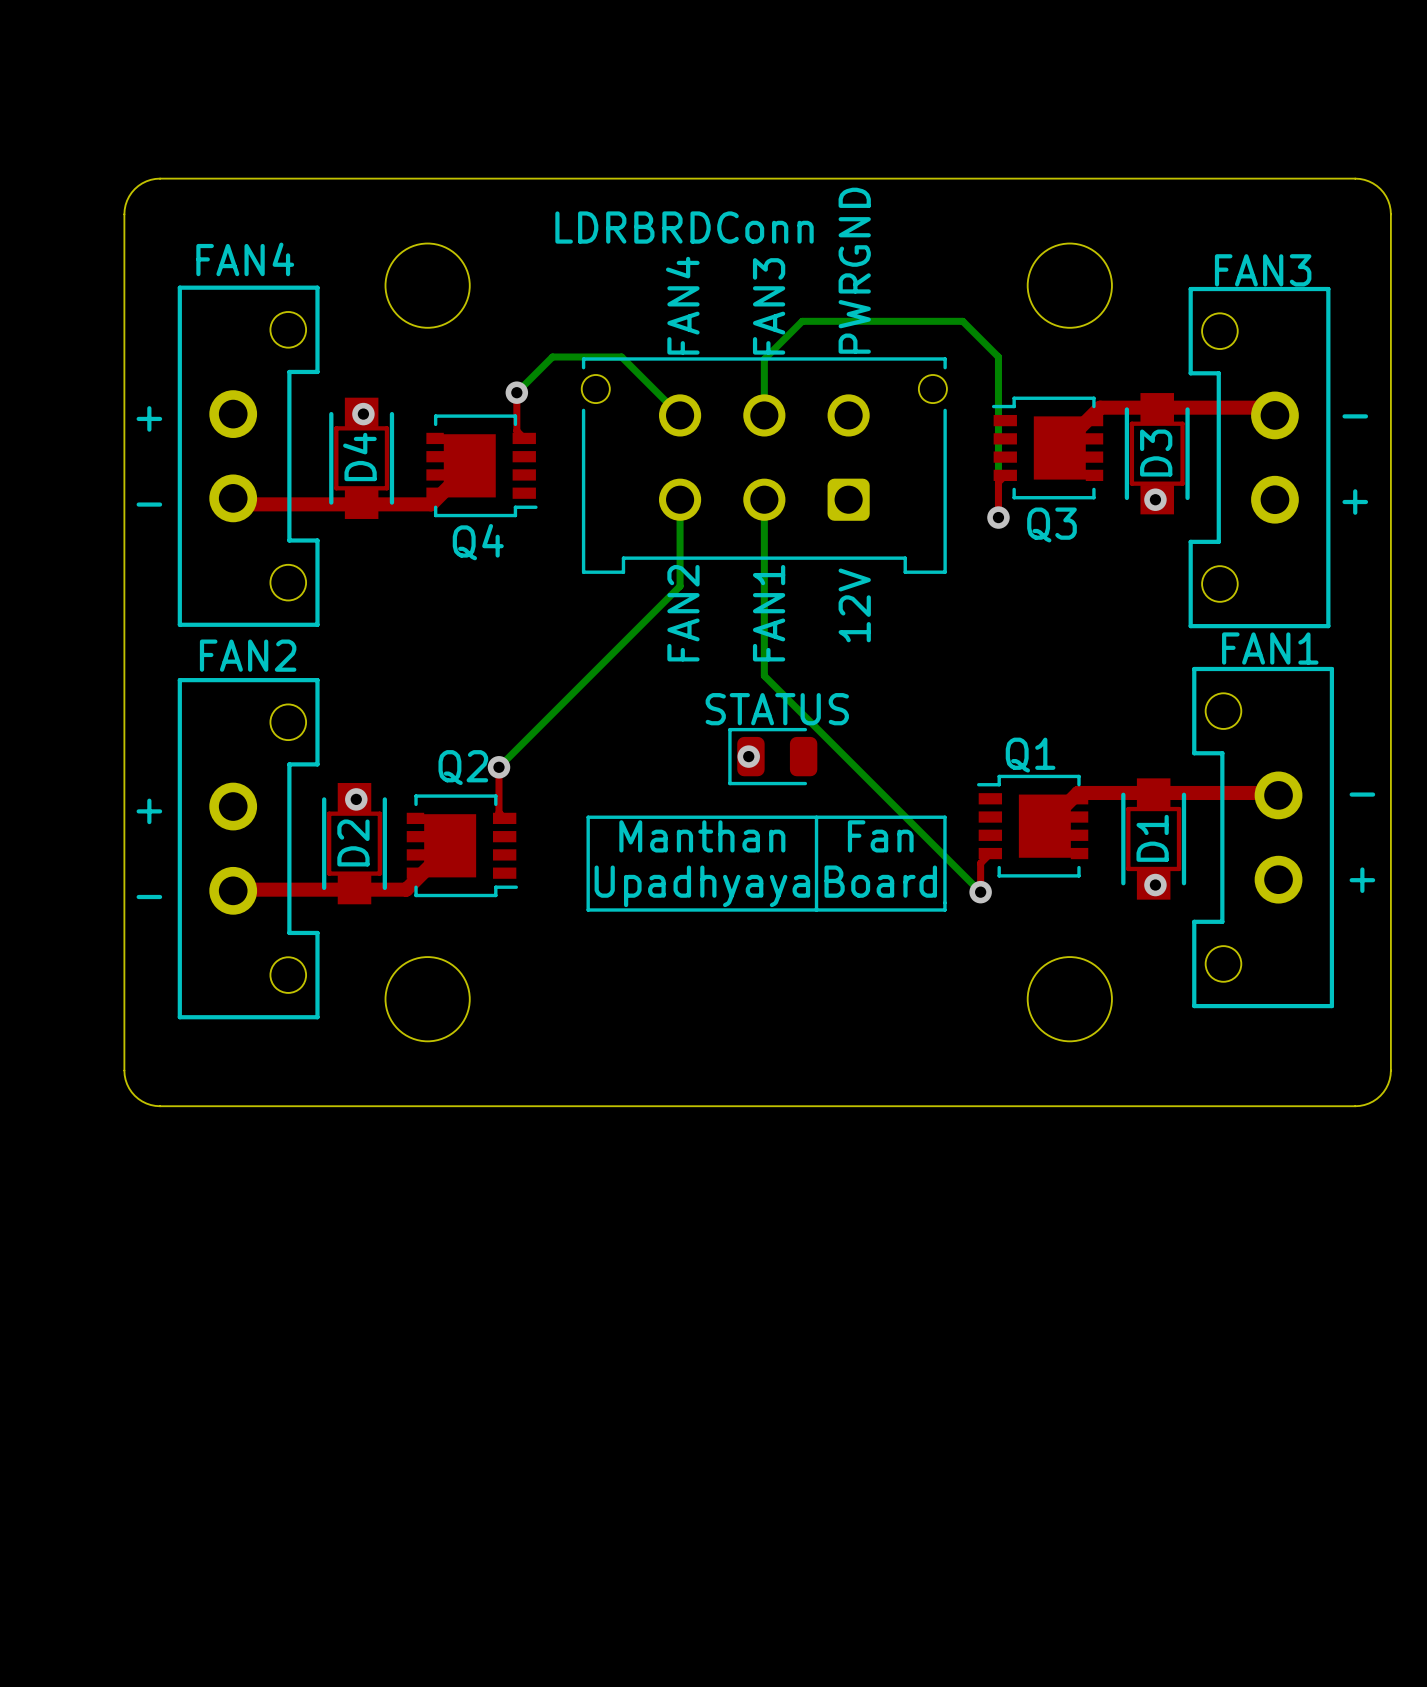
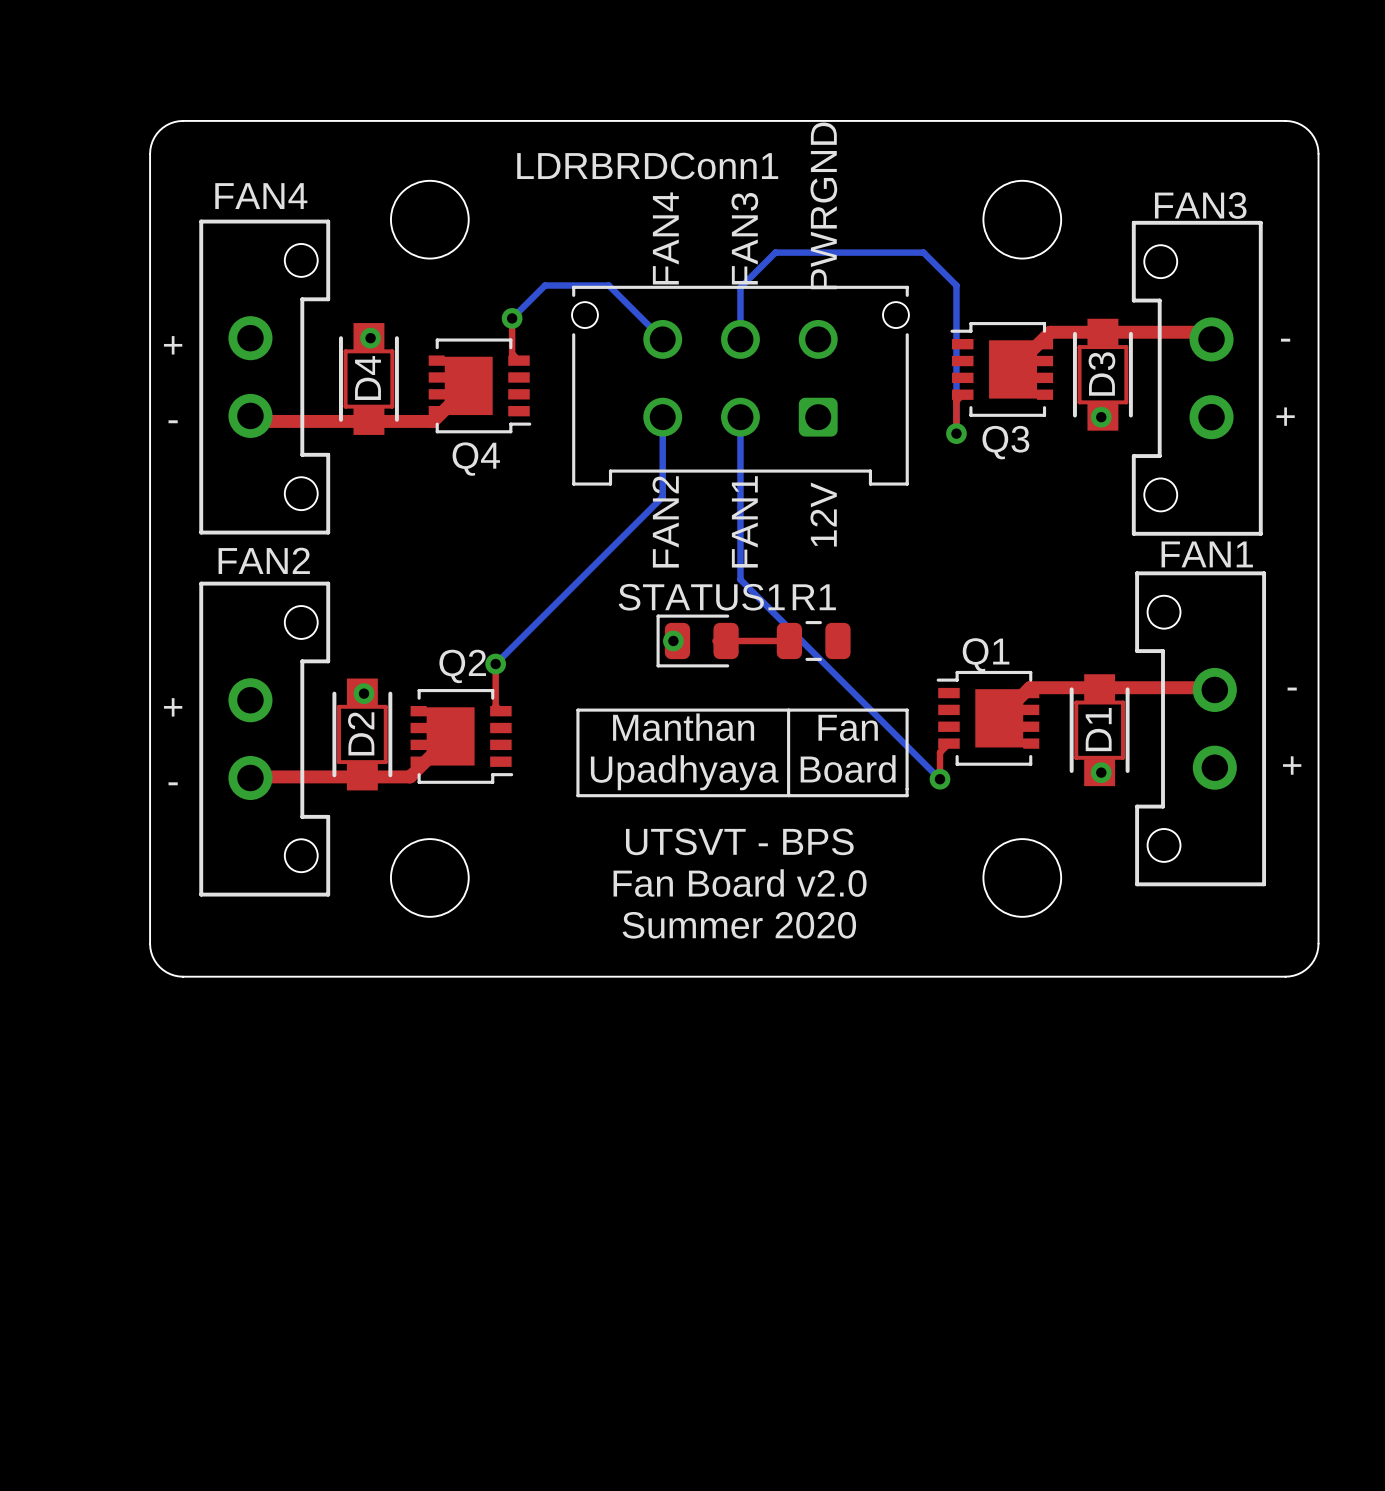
LDRBRDConn name: LDRBRDConn (684, 227) -> LDRBRDConn1 (647, 166)
STATUS1: none -> (697, 640)
top track: none -> (715, 640) (791, 640)
R1: none -> (813, 640)
via position: (748, 756) -> (673, 640)
STATUS: (772, 756) -> none
text: none -> UTSVT - BPS (739, 841)
text: none -> Fan Board v2.0 (740, 883)
text: none -> Summer 2020 (739, 925)

